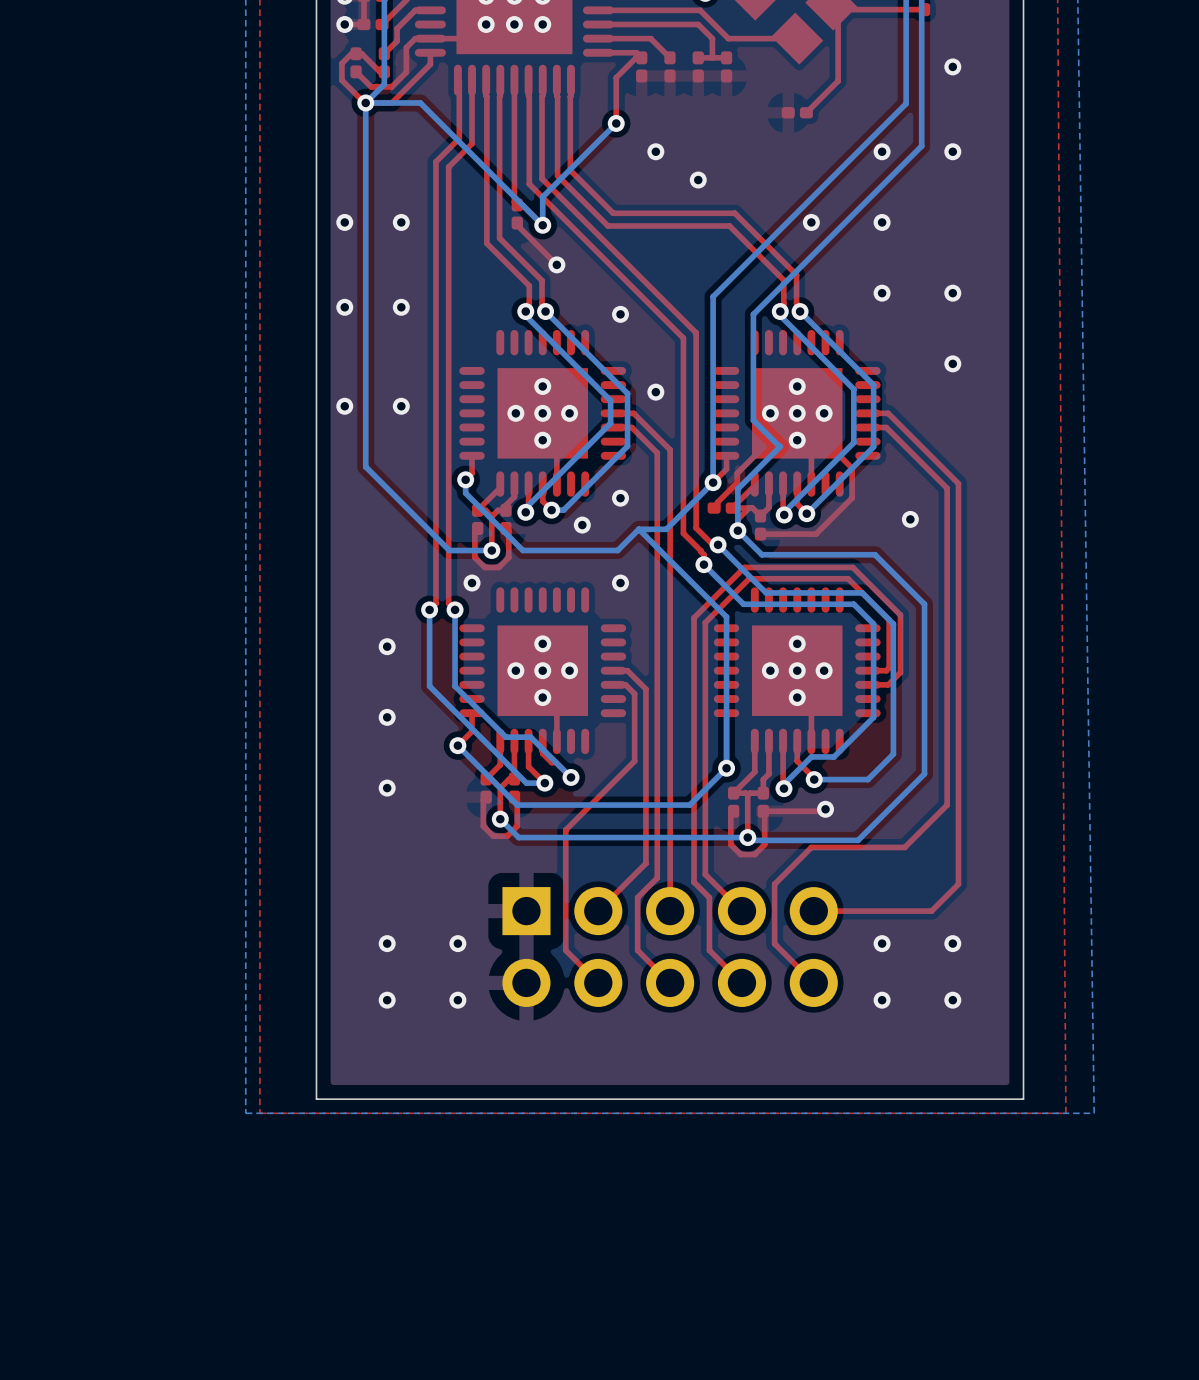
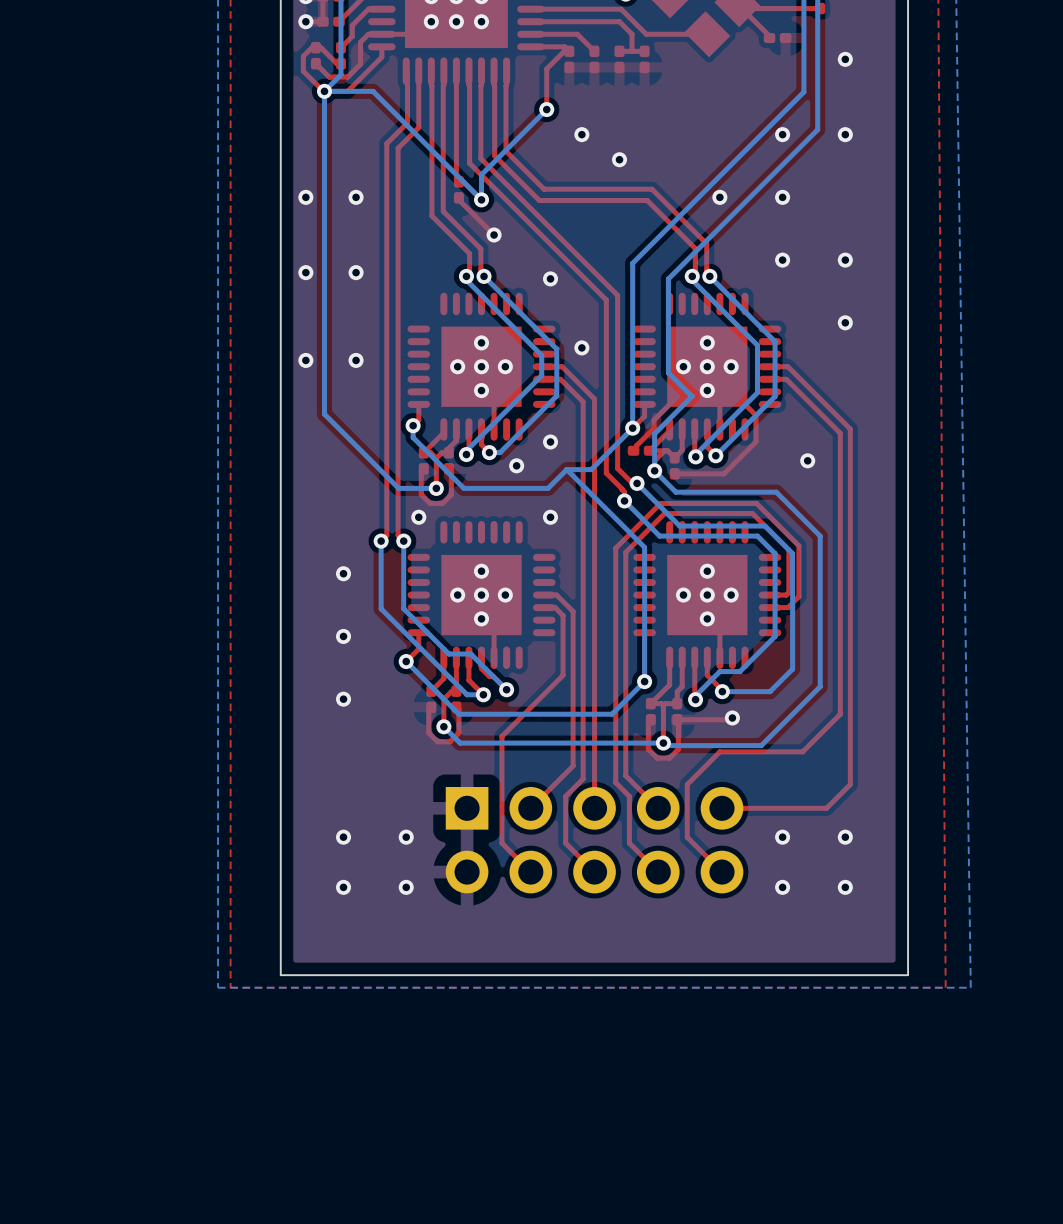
top track: (838, 11) (838, 81) (806, 112) -> (743, 10) (769, 38)
part position: (797, 112) -> (777, 38)

